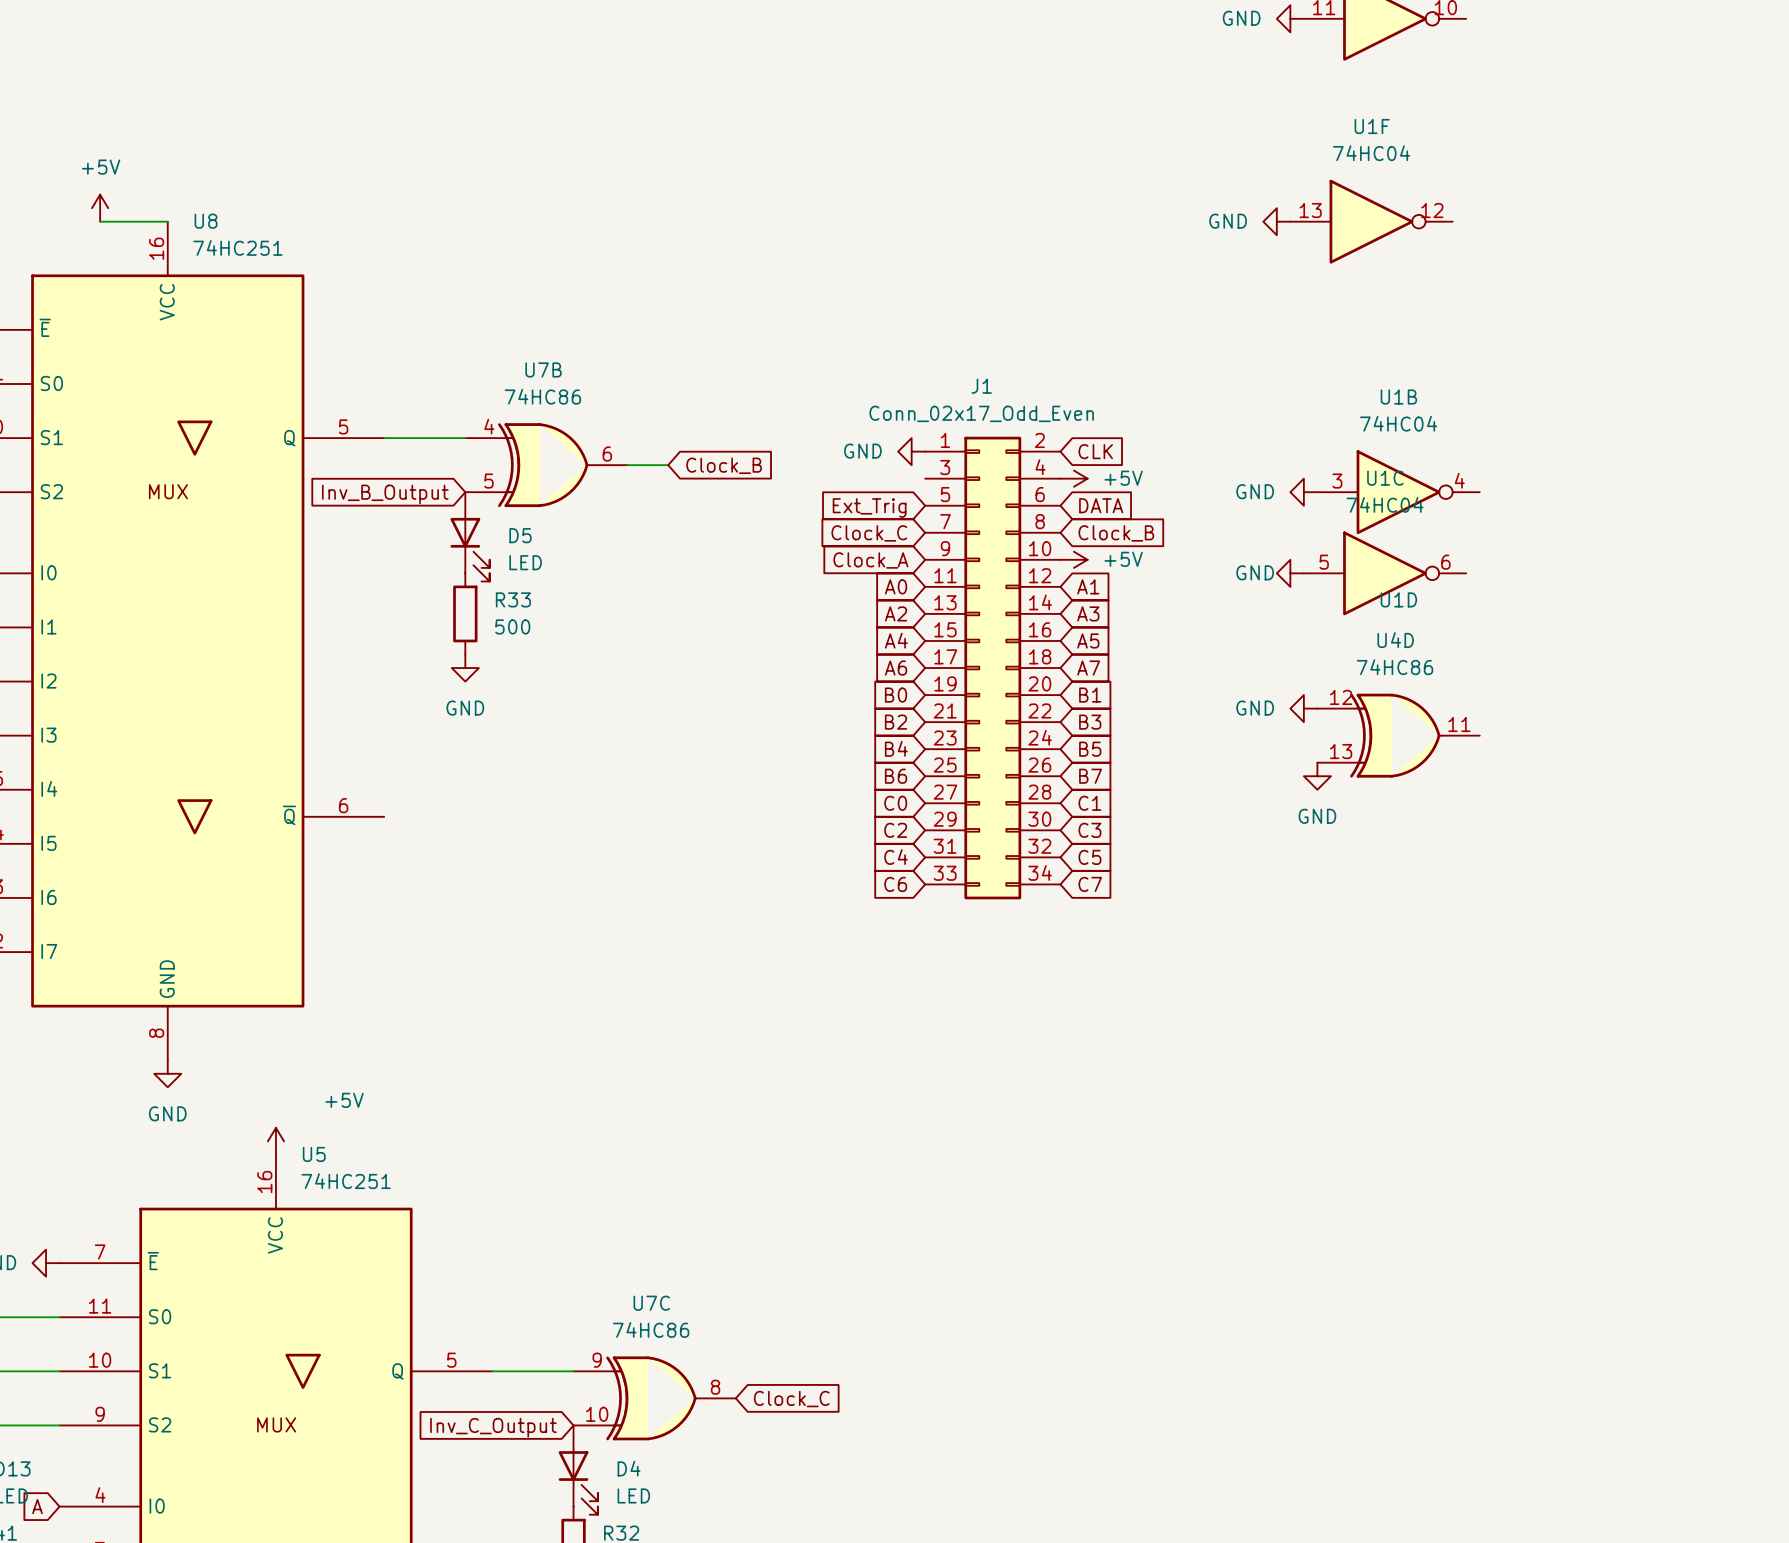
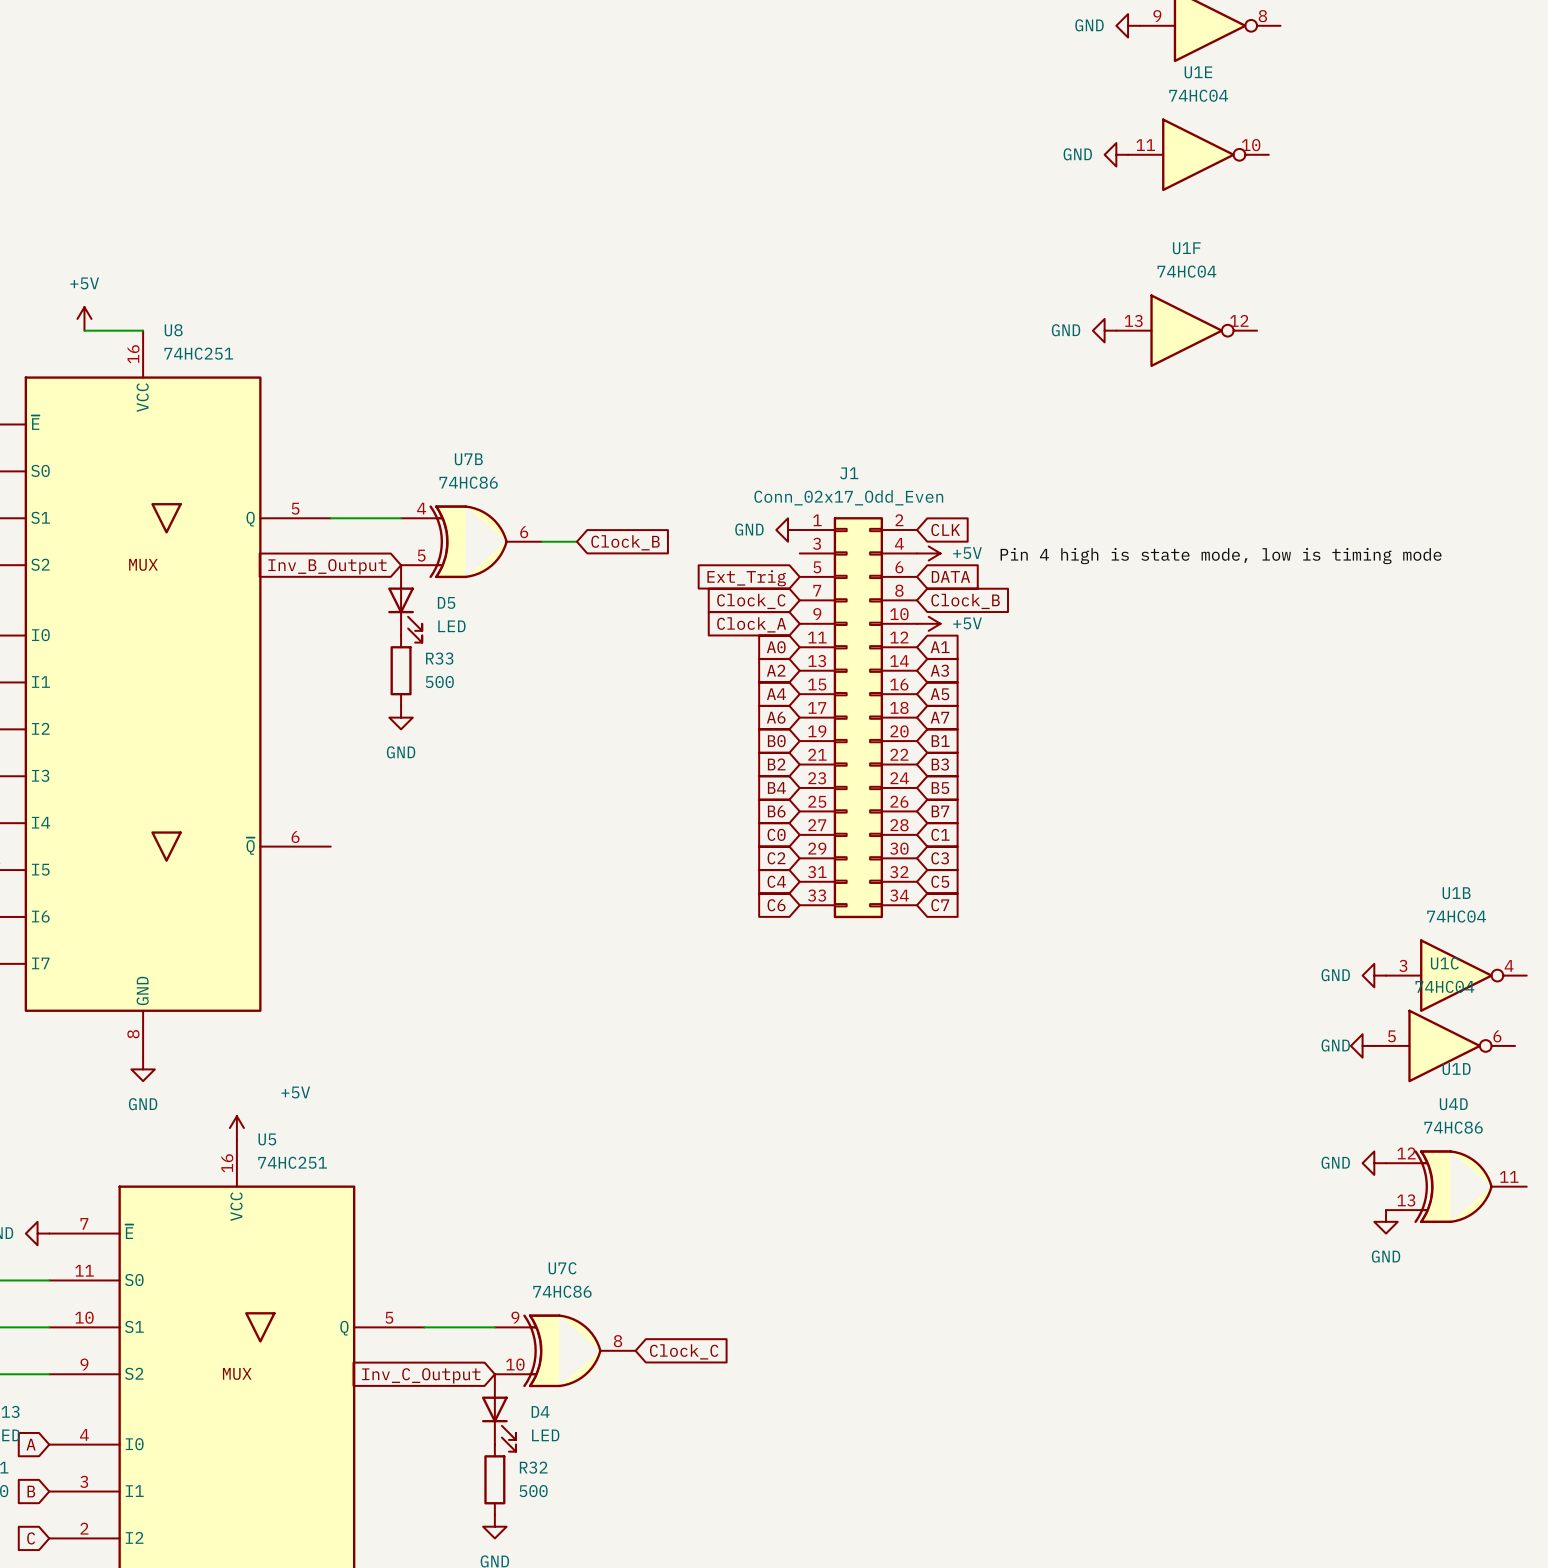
label: none -> Pin 4 high is state mode, low is timing mode (1221, 556)
power symbol: GND (1303, 492) -> none
U1B position: (1398, 492) -> (1456, 975)
power symbol: GND (1290, 573) -> none
U1C position: (1385, 573) -> (1444, 1045)
U1D name position: U1D (1398, 599) -> U1D (1456, 1069)
power symbol: GND (1303, 708) -> none
U4D position: (1398, 735) -> (1456, 1186)
power symbol: GND (1317, 776) -> none
power symbol: none -> GND (1374, 975)
power symbol: none -> GND (1362, 1045)
power symbol: none -> GND (1374, 1163)
power symbol: none -> GND (1386, 1221)

